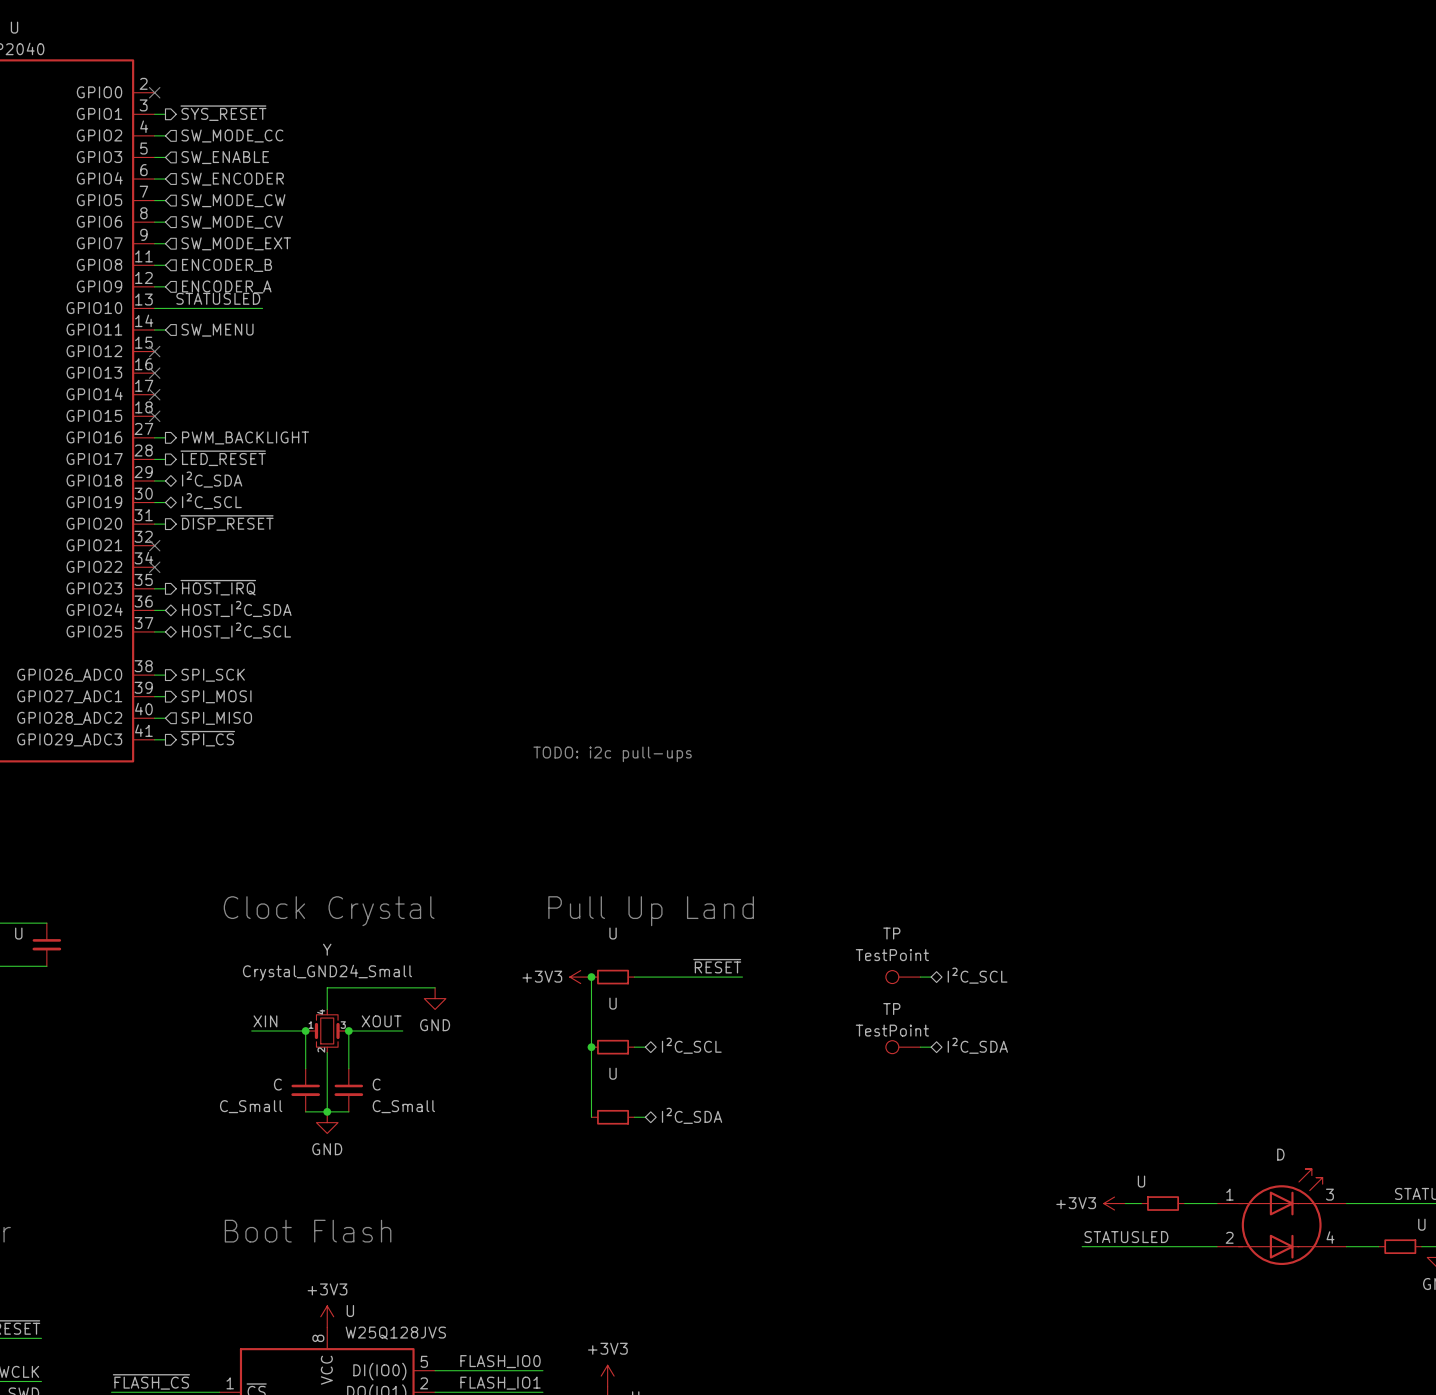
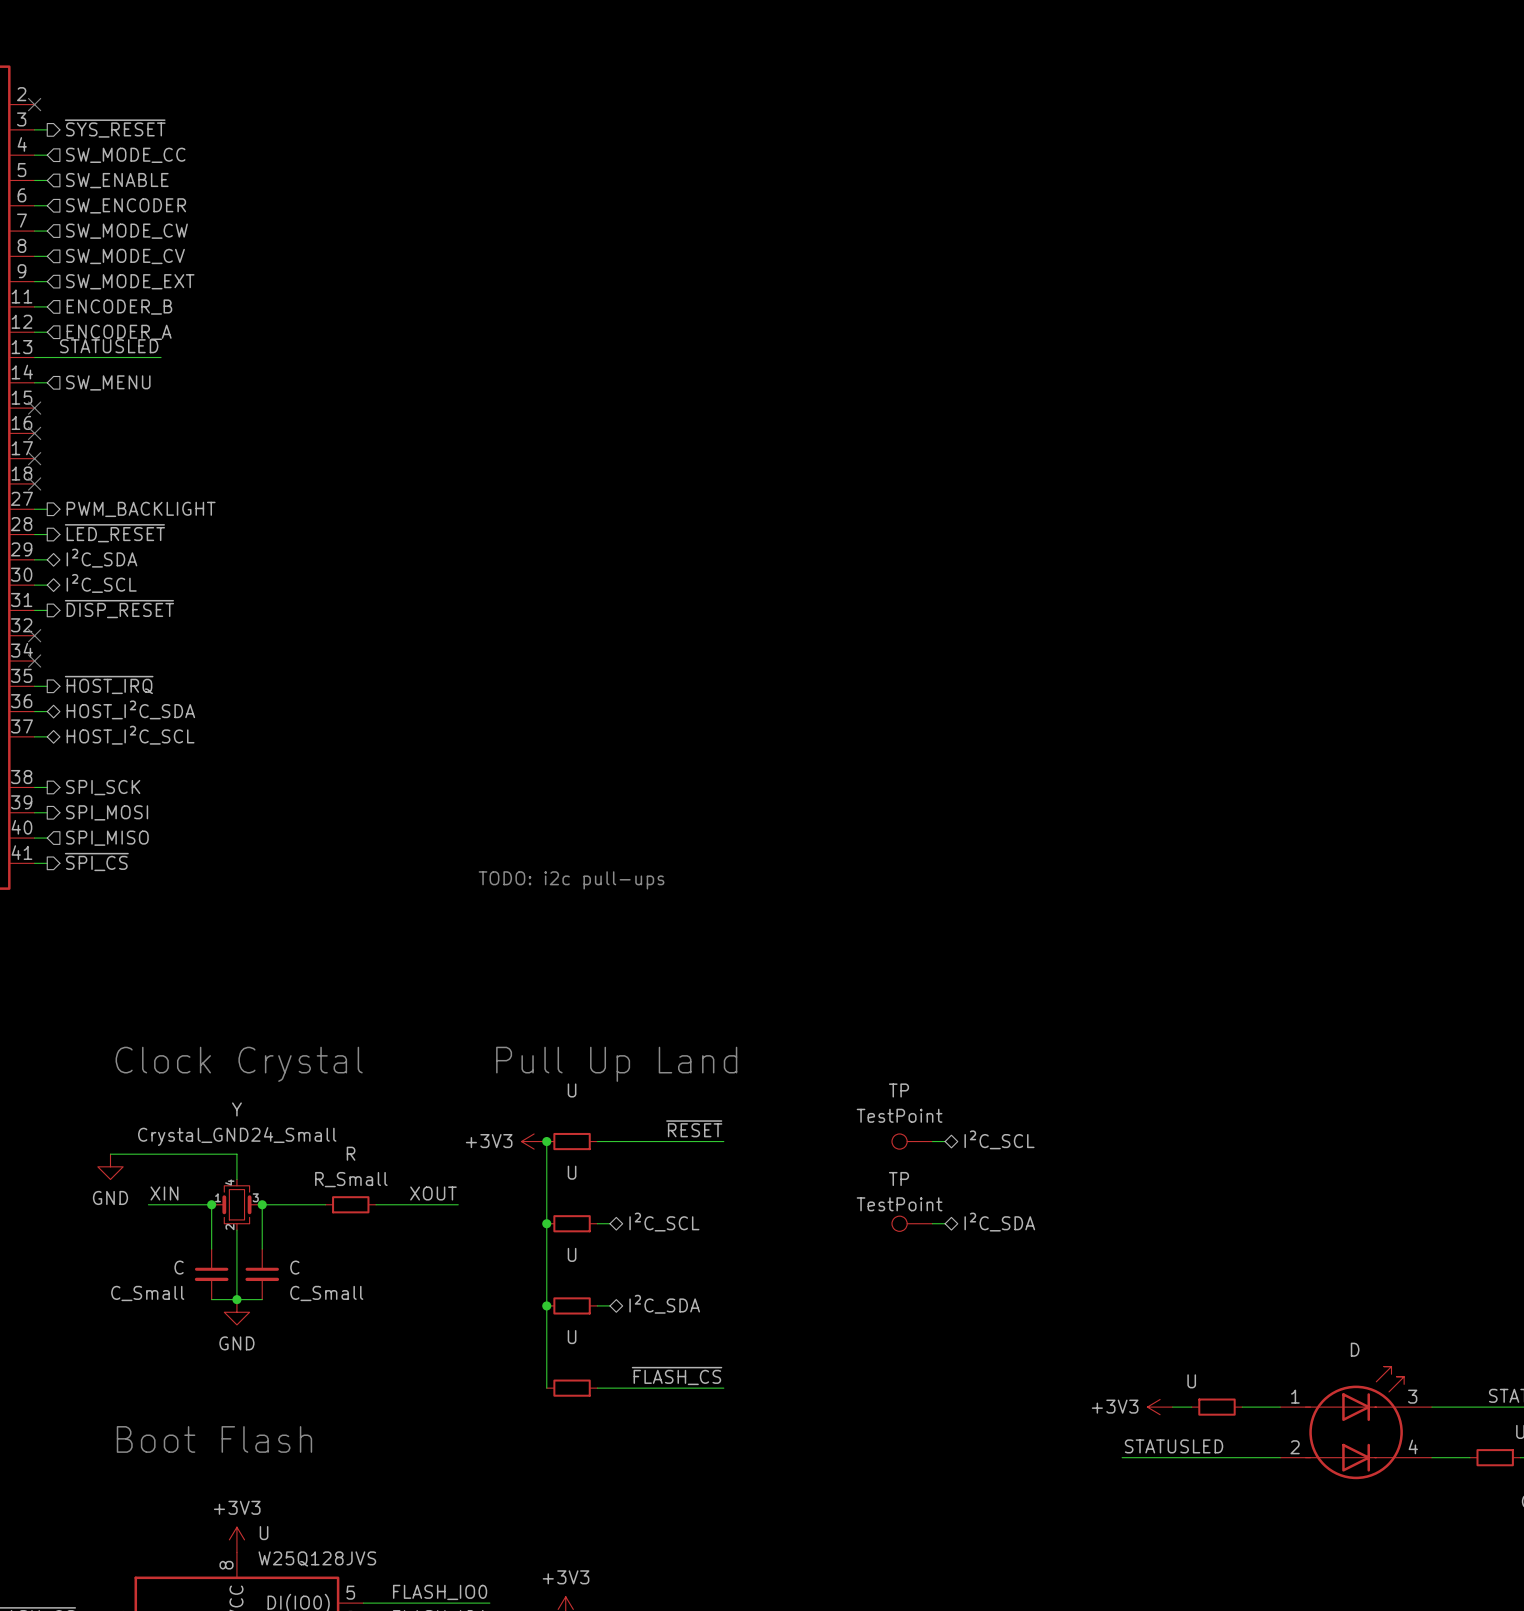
wire: (327, 987) (435, 987) -> (236, 1154) (110, 1154)
power symbol: none -> GND (110, 1166)
power symbol: GND (435, 998) -> none
label position: XOUT (381, 1021) -> XOUT (433, 1193)
R: none -> R_Small (350, 1204)
wire: none -> (376, 1204) (458, 1204)
wire: none -> (546, 1305) (546, 1388)
junction: none -> (546, 1305)
label: none -> ~{FLASH_CS} (677, 1375)
U: none -> (572, 1388)
wire: none -> (597, 1388) (723, 1388)

